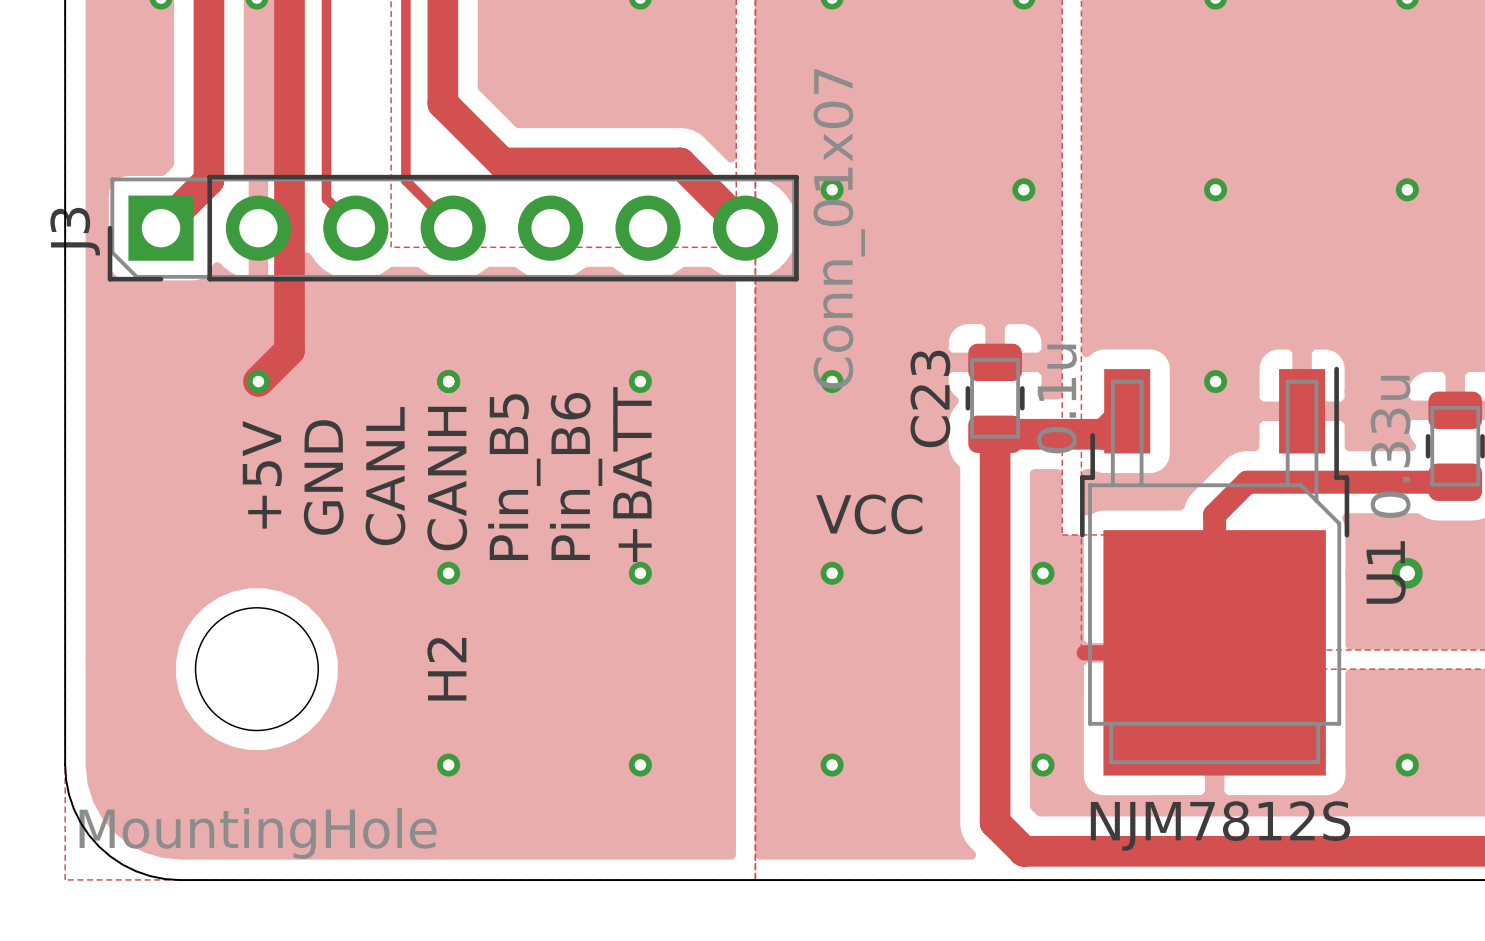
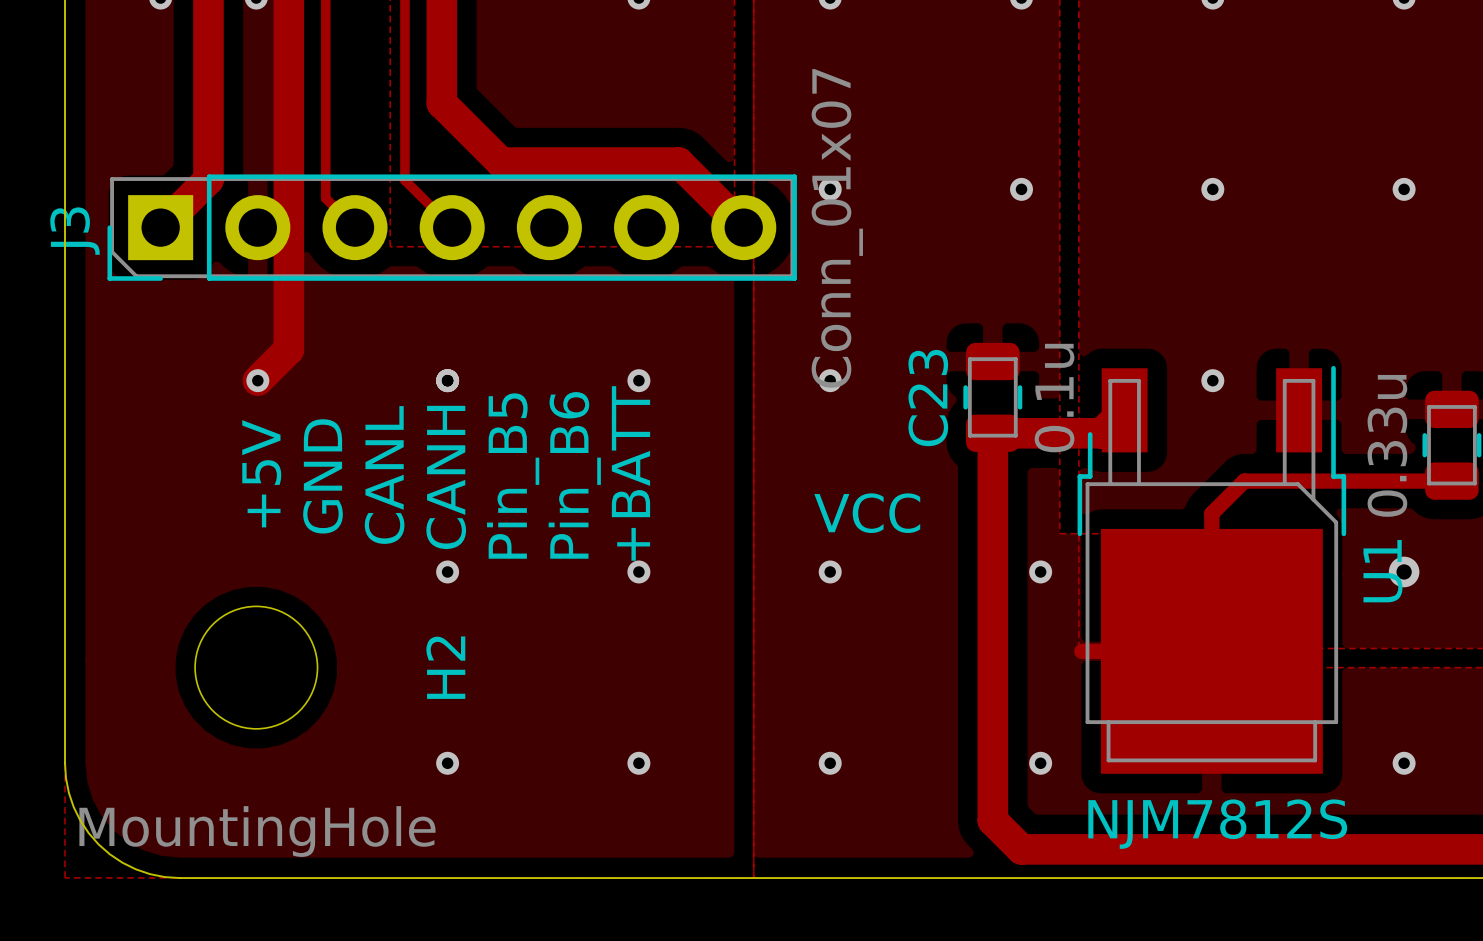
track width: thick (1455, 482) (1247, 482) (1214, 514) (1214, 652) -> thin (1451, 481) (1244, 481) (1211, 513) (1211, 651)

